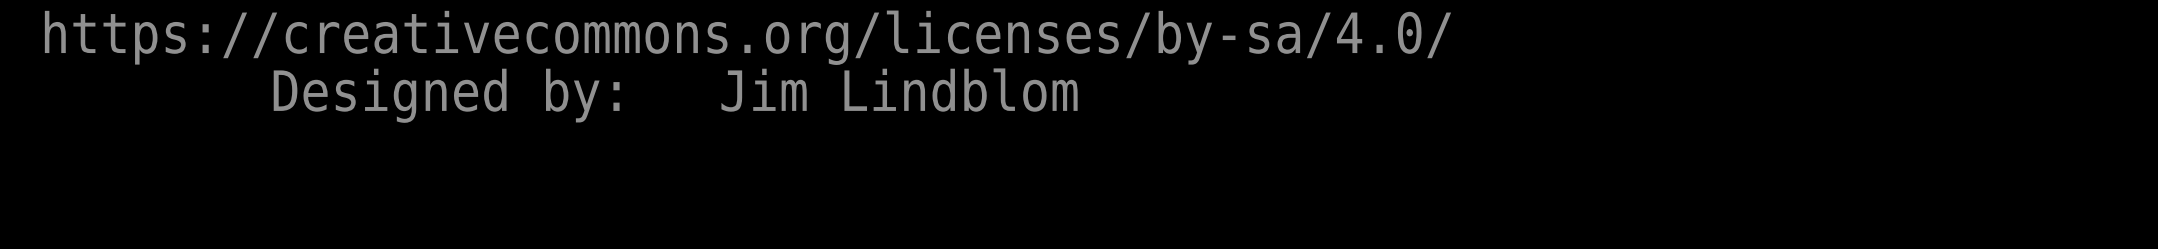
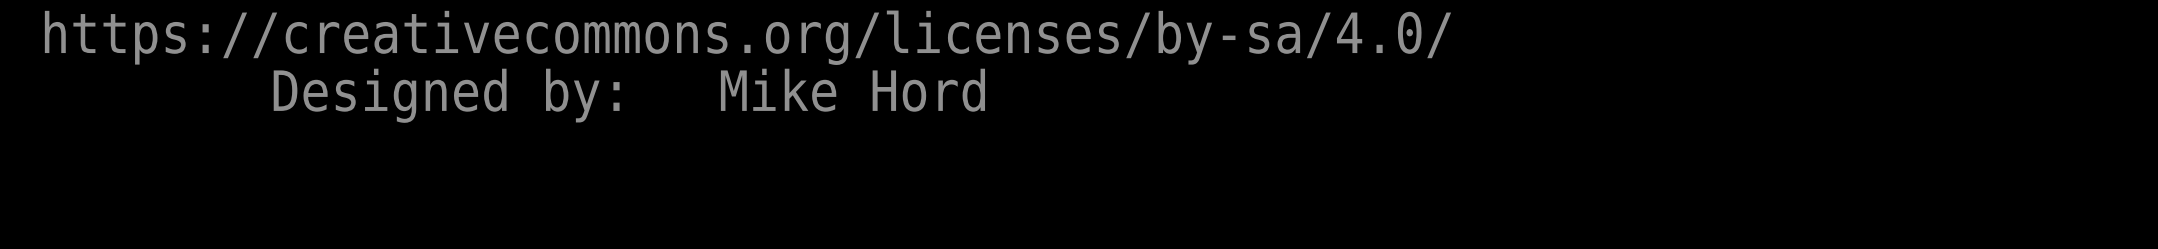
text: Jim Lindblom (899, 90) -> Mike Hord (852, 90)

